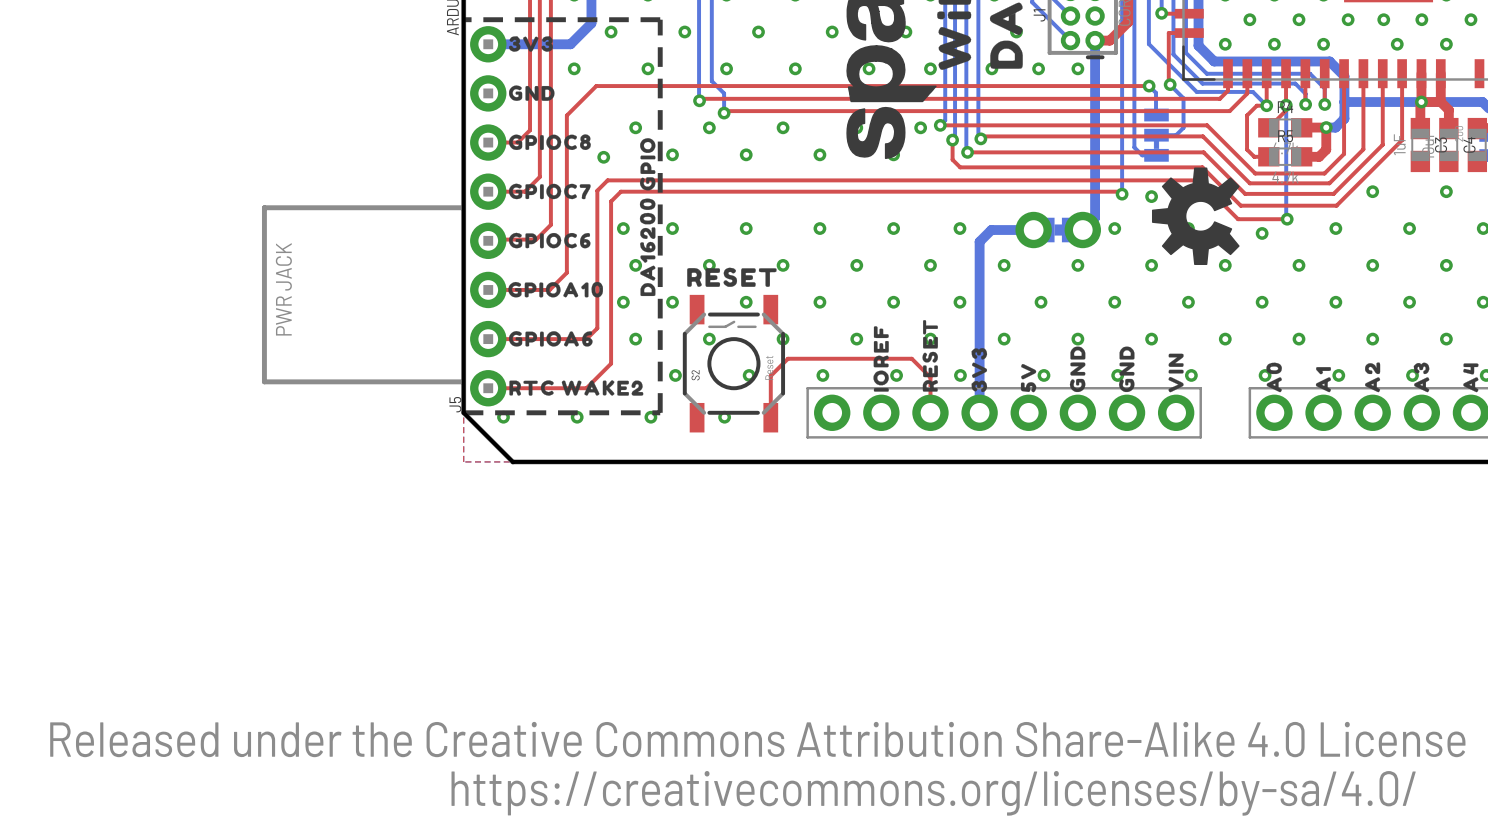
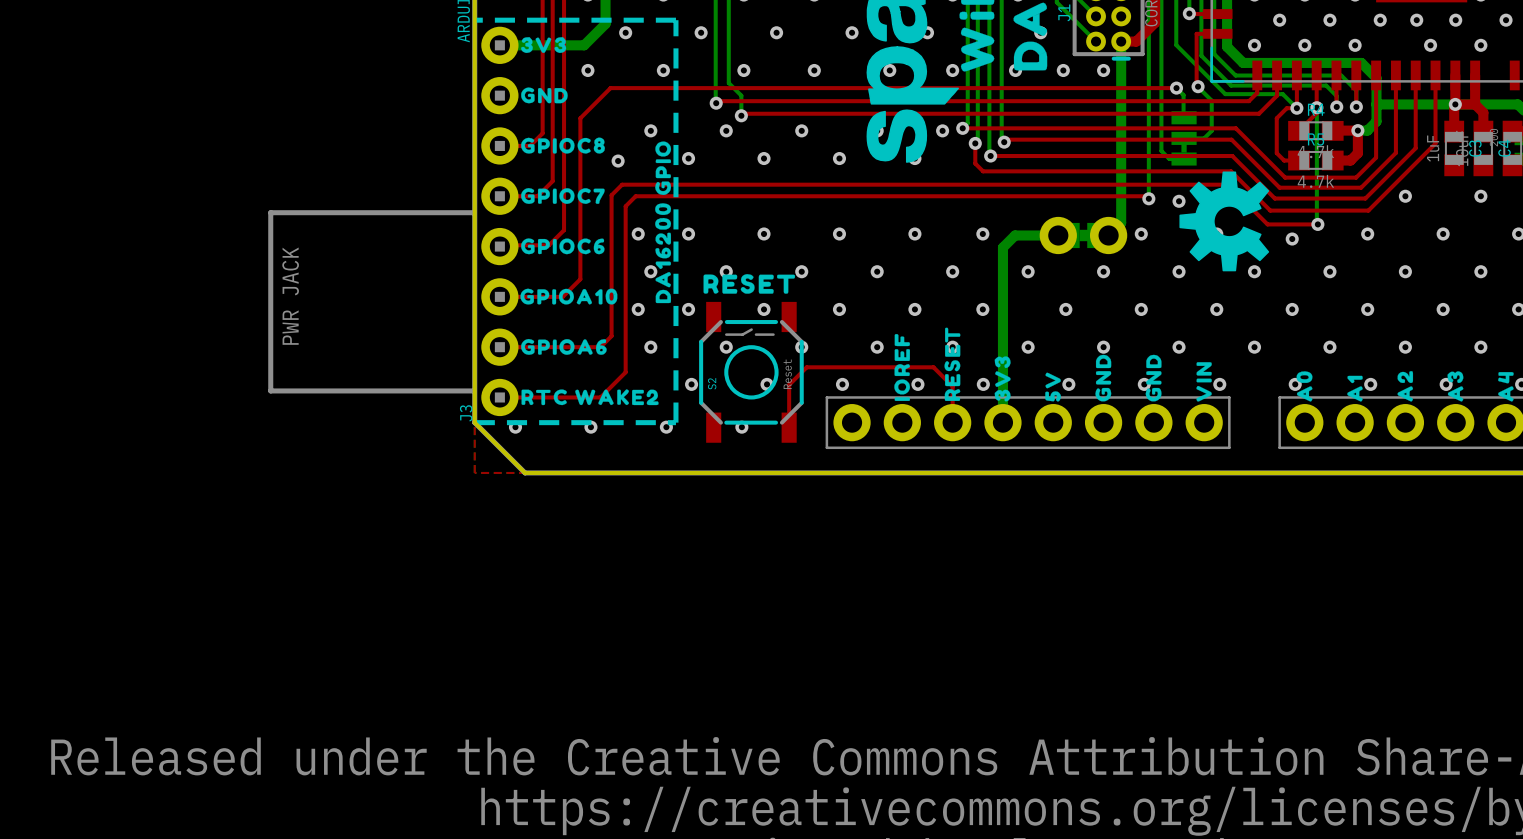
J5 name: J5 (455, 404) -> J3 (466, 413)

